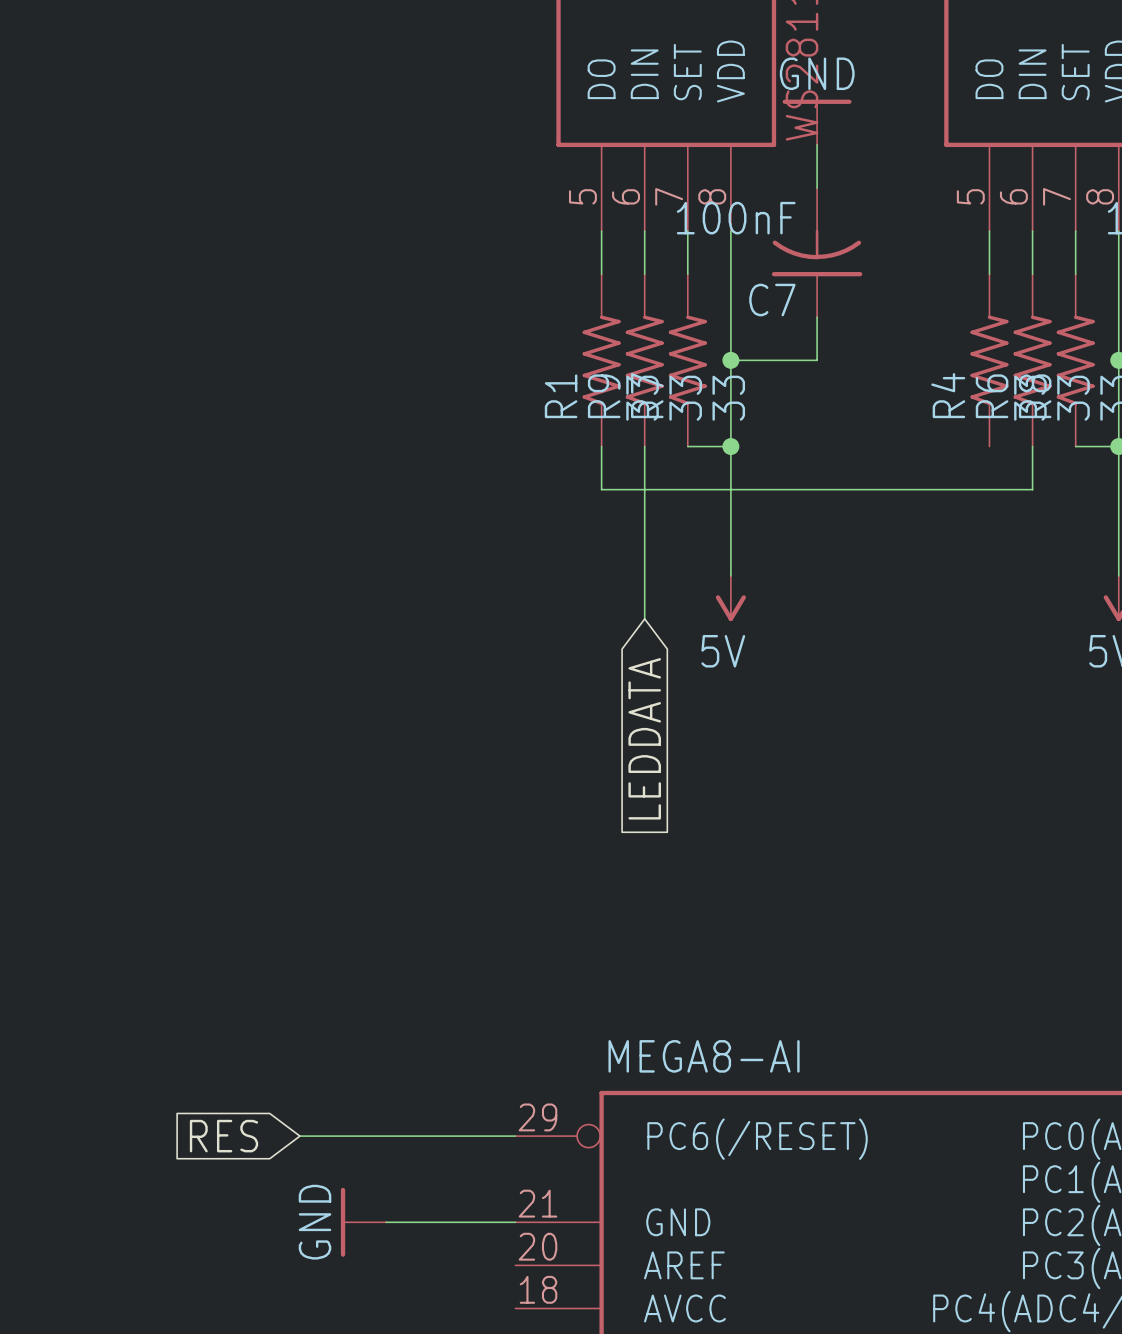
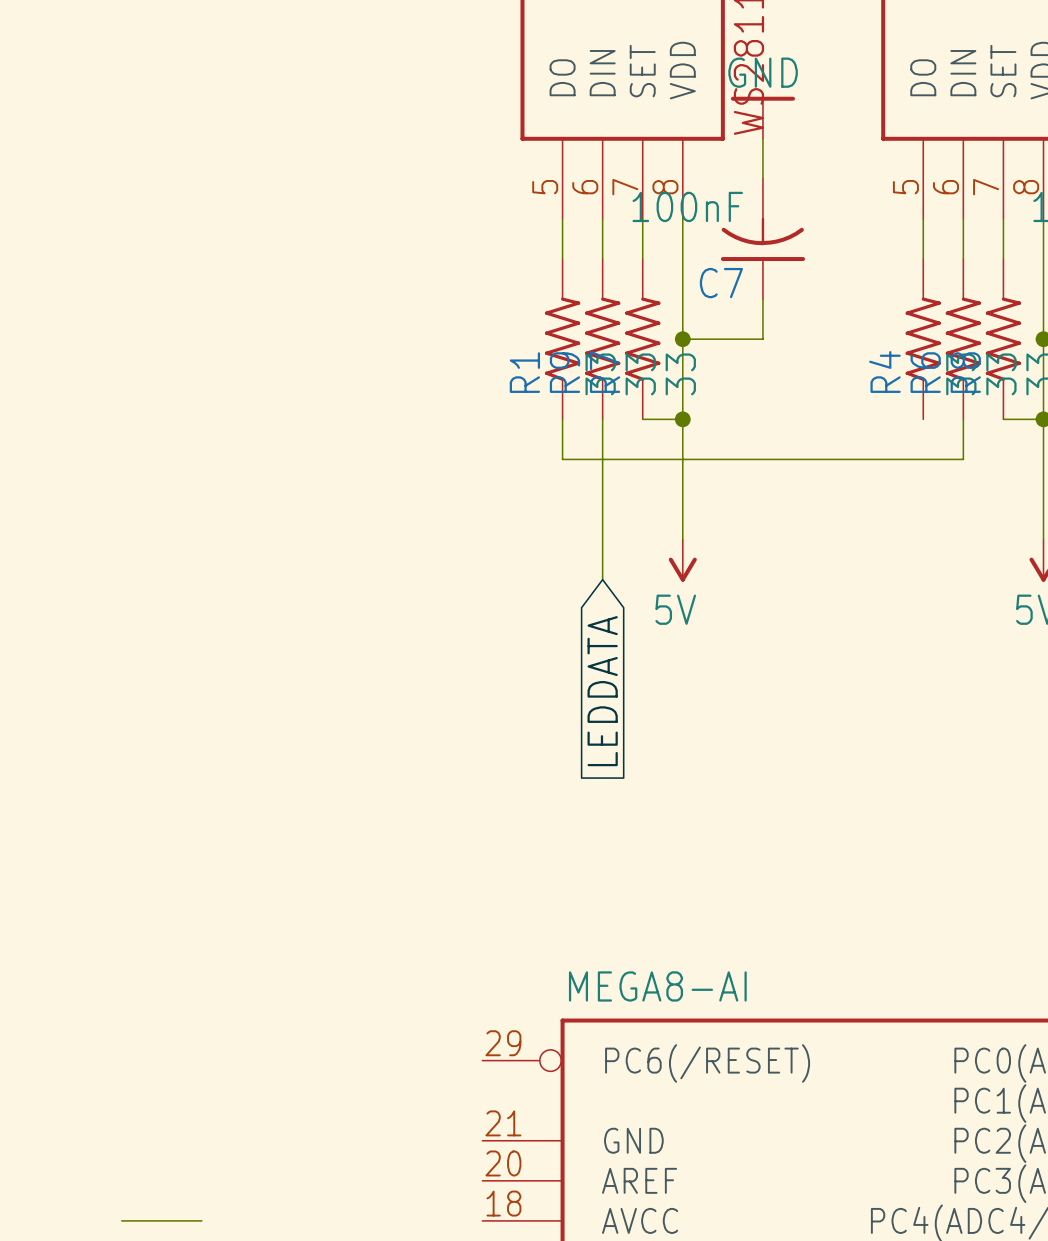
global label: RES (223, 1136) -> none
wire: (299, 1136) (515, 1136) -> none
power symbol: GND (363, 1222) -> none
wire: (386, 1222) (515, 1222) -> none
wire: none -> (121, 1220) (201, 1220)

